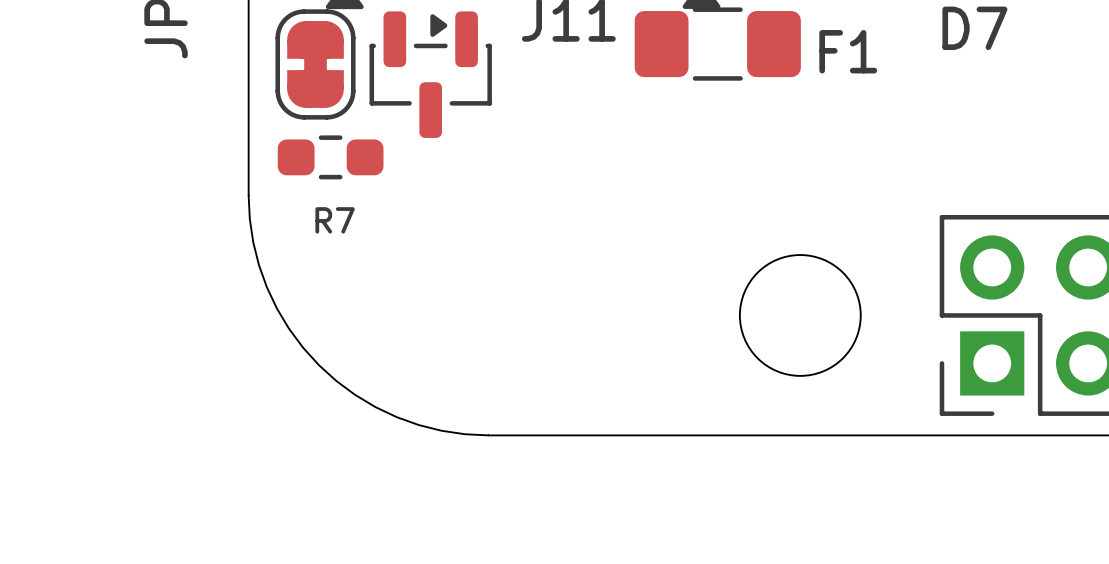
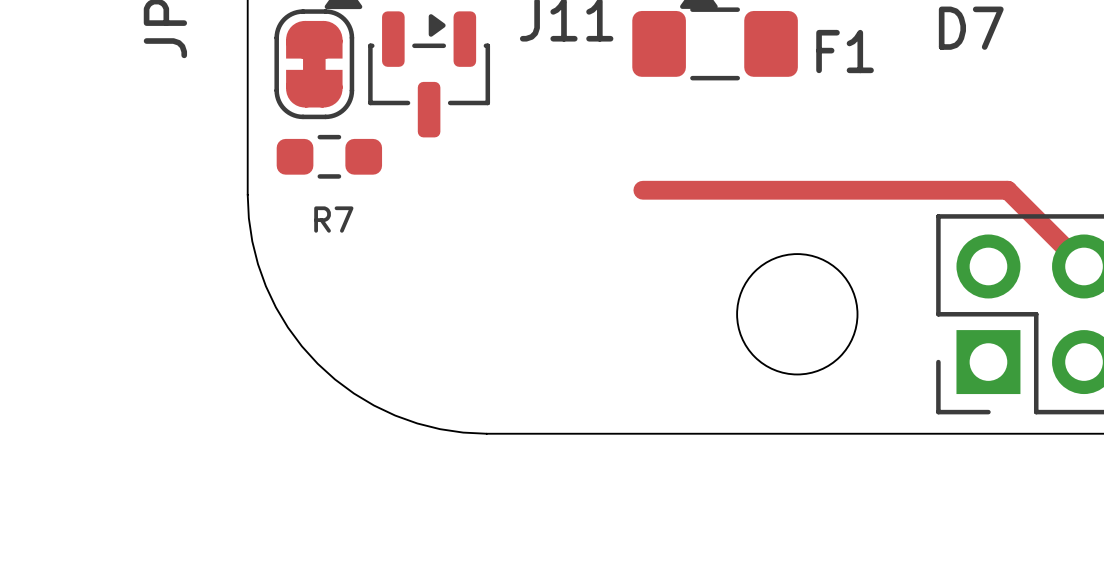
track: none -> (642, 190) (1007, 190) (1084, 266)

